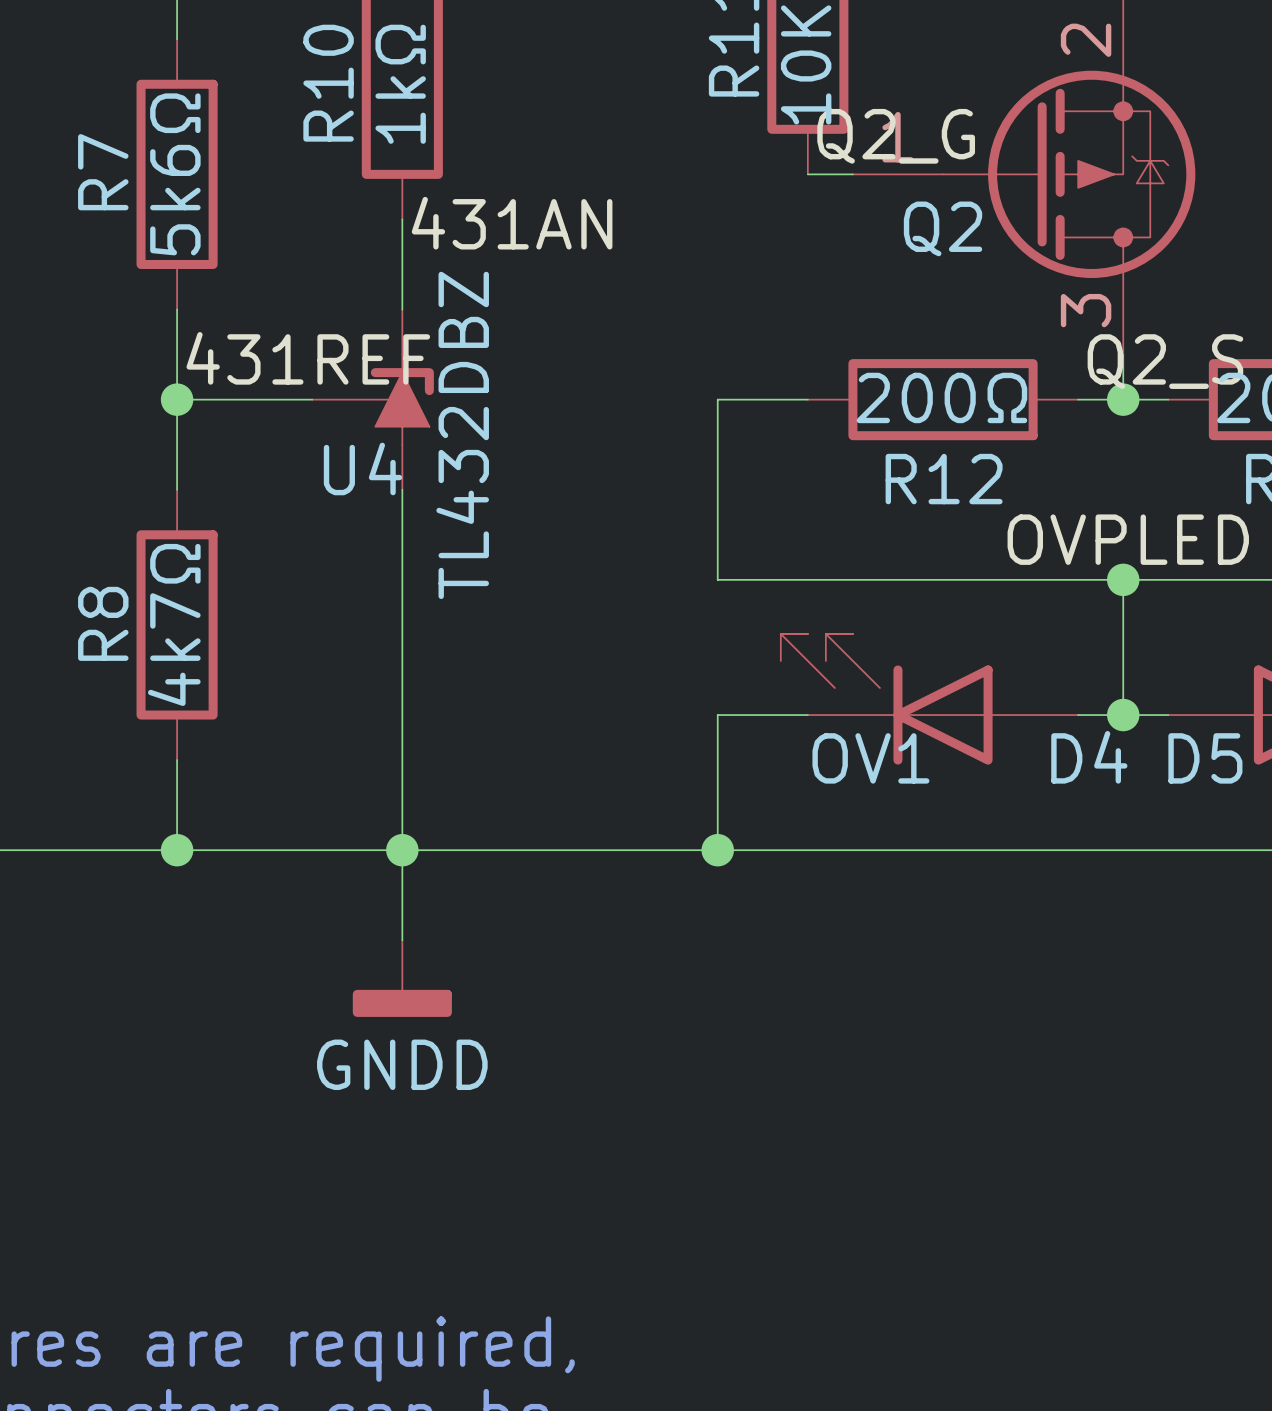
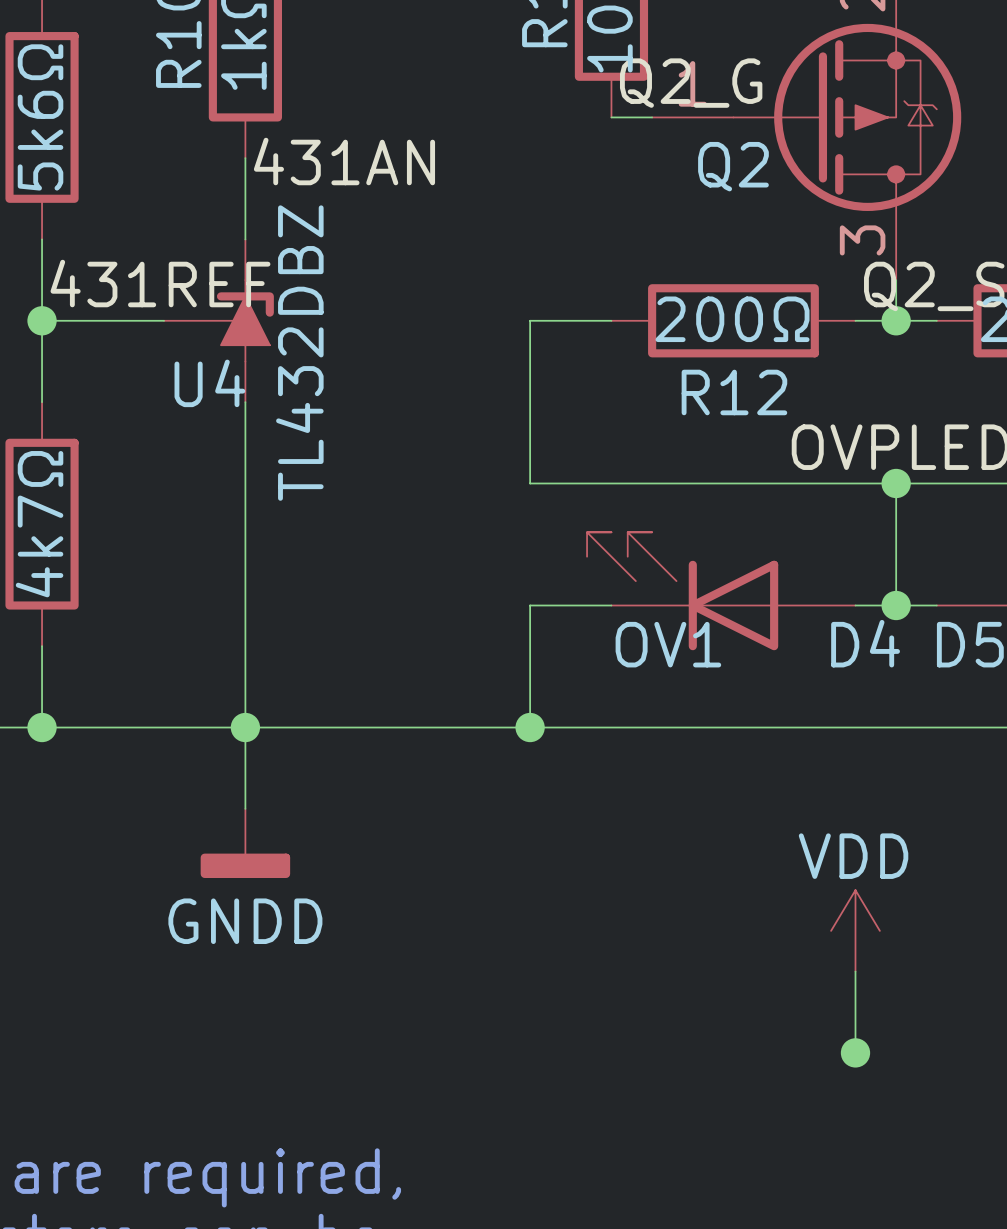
power symbol: none -> VDD (855, 930)
wire: none -> (855, 971) (855, 1052)
junction: none -> (855, 1052)

